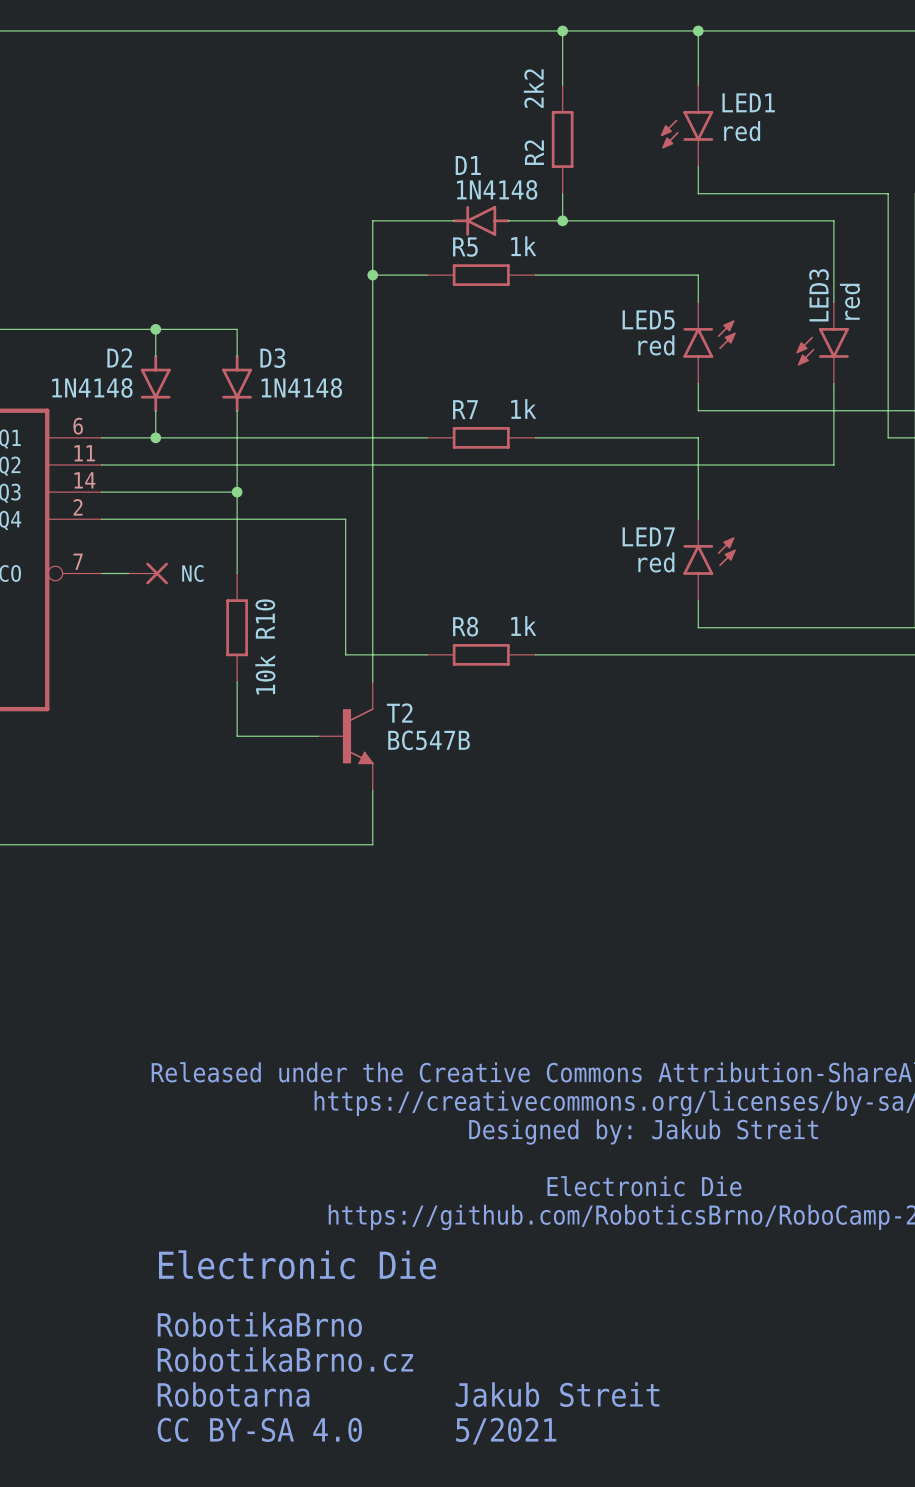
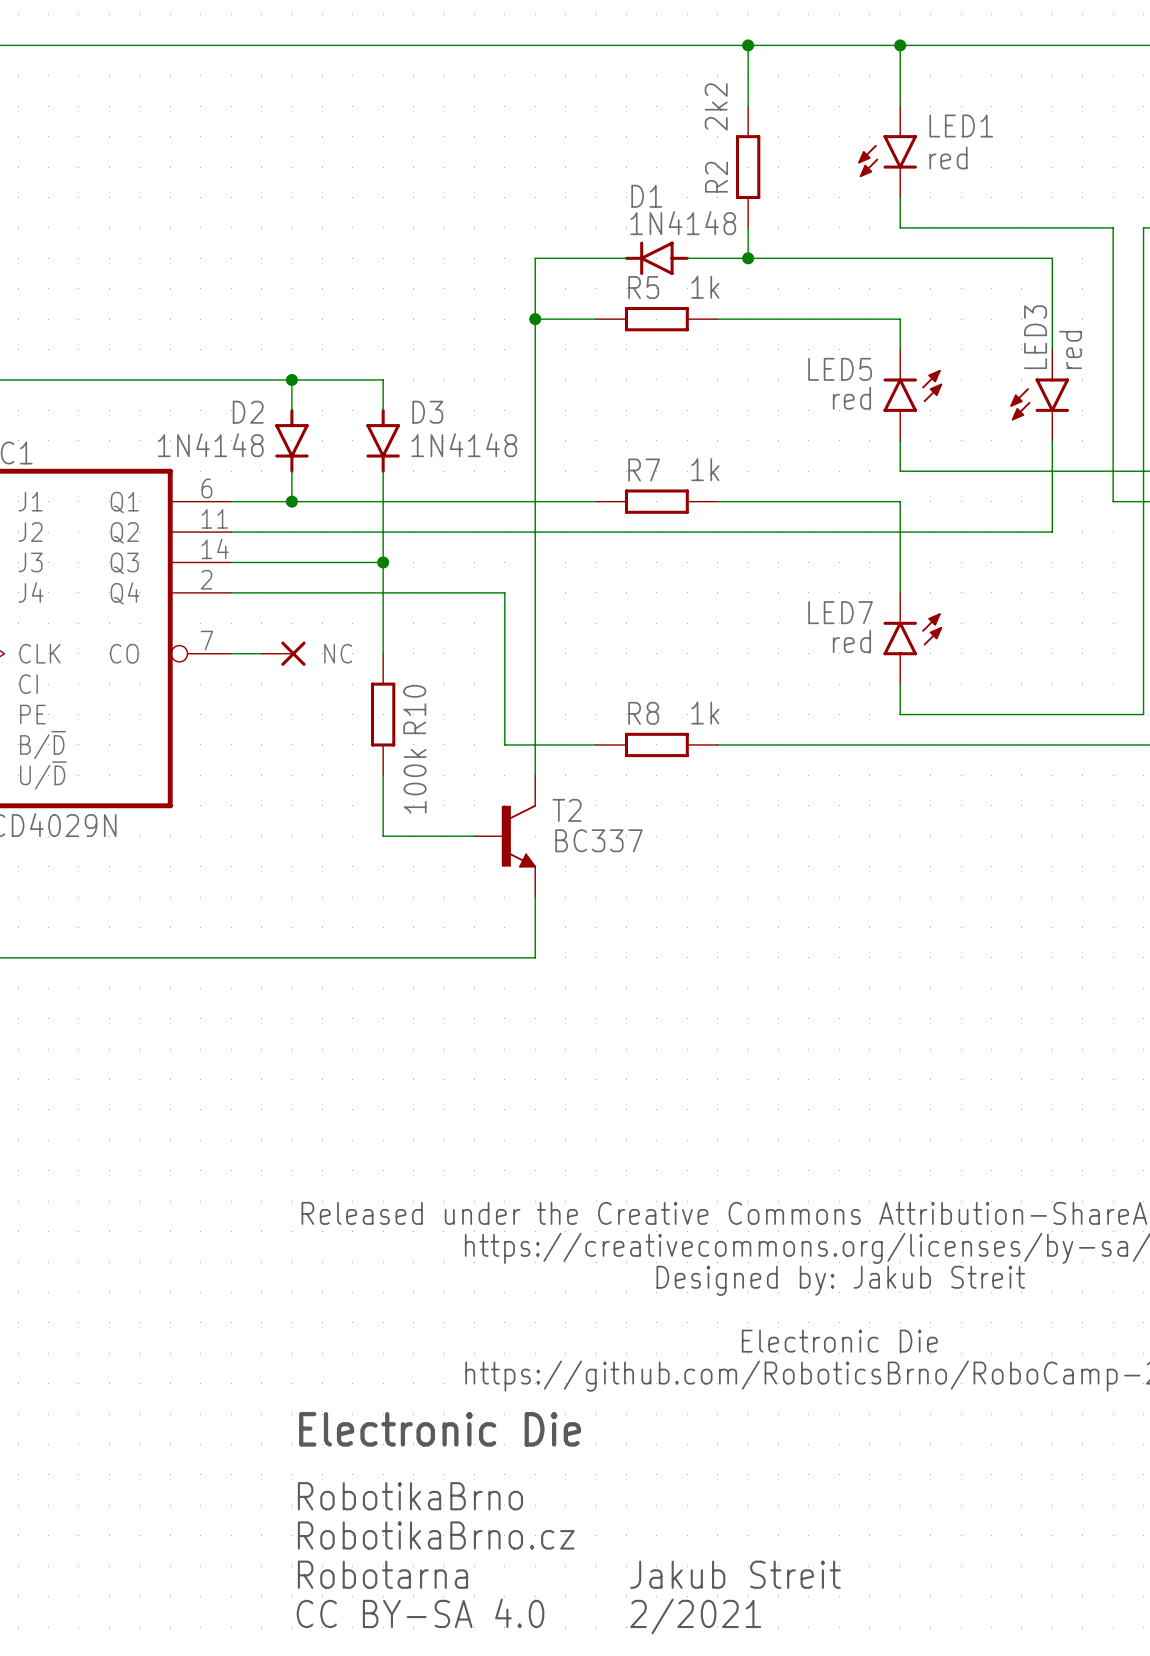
R10 value: 10k (265, 674) -> 100k (415, 781)
T2 value: BC547B (429, 740) -> BC337 (599, 840)
text: 5/2021 (506, 1431) -> 2/2021 (695, 1616)

